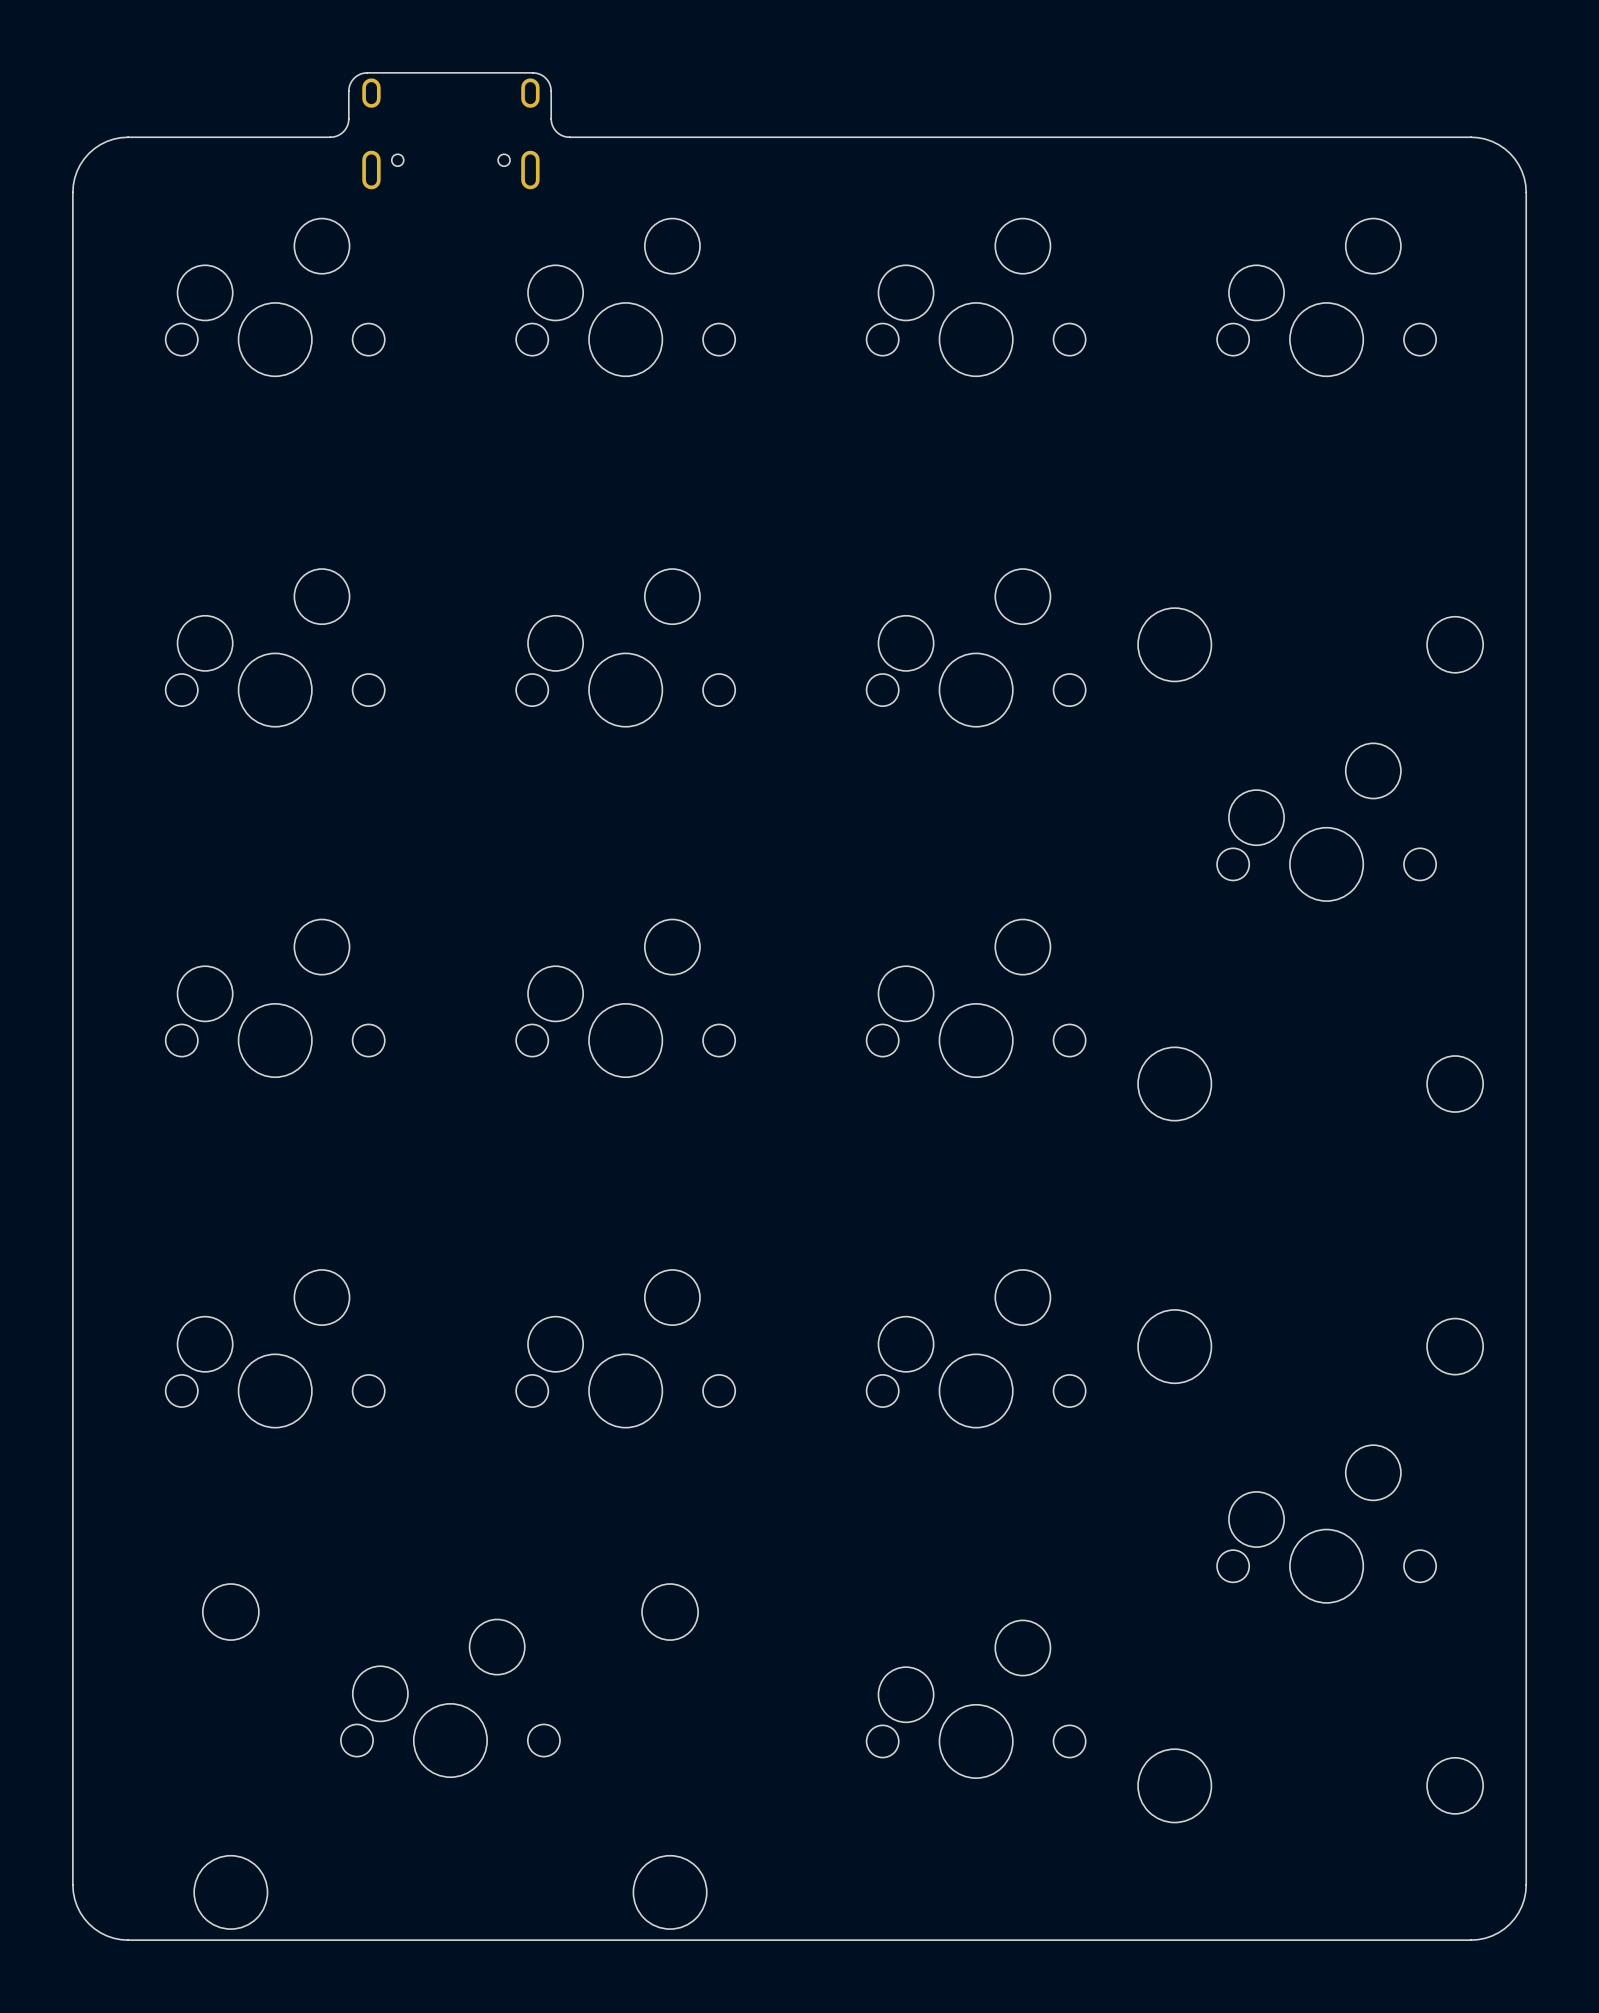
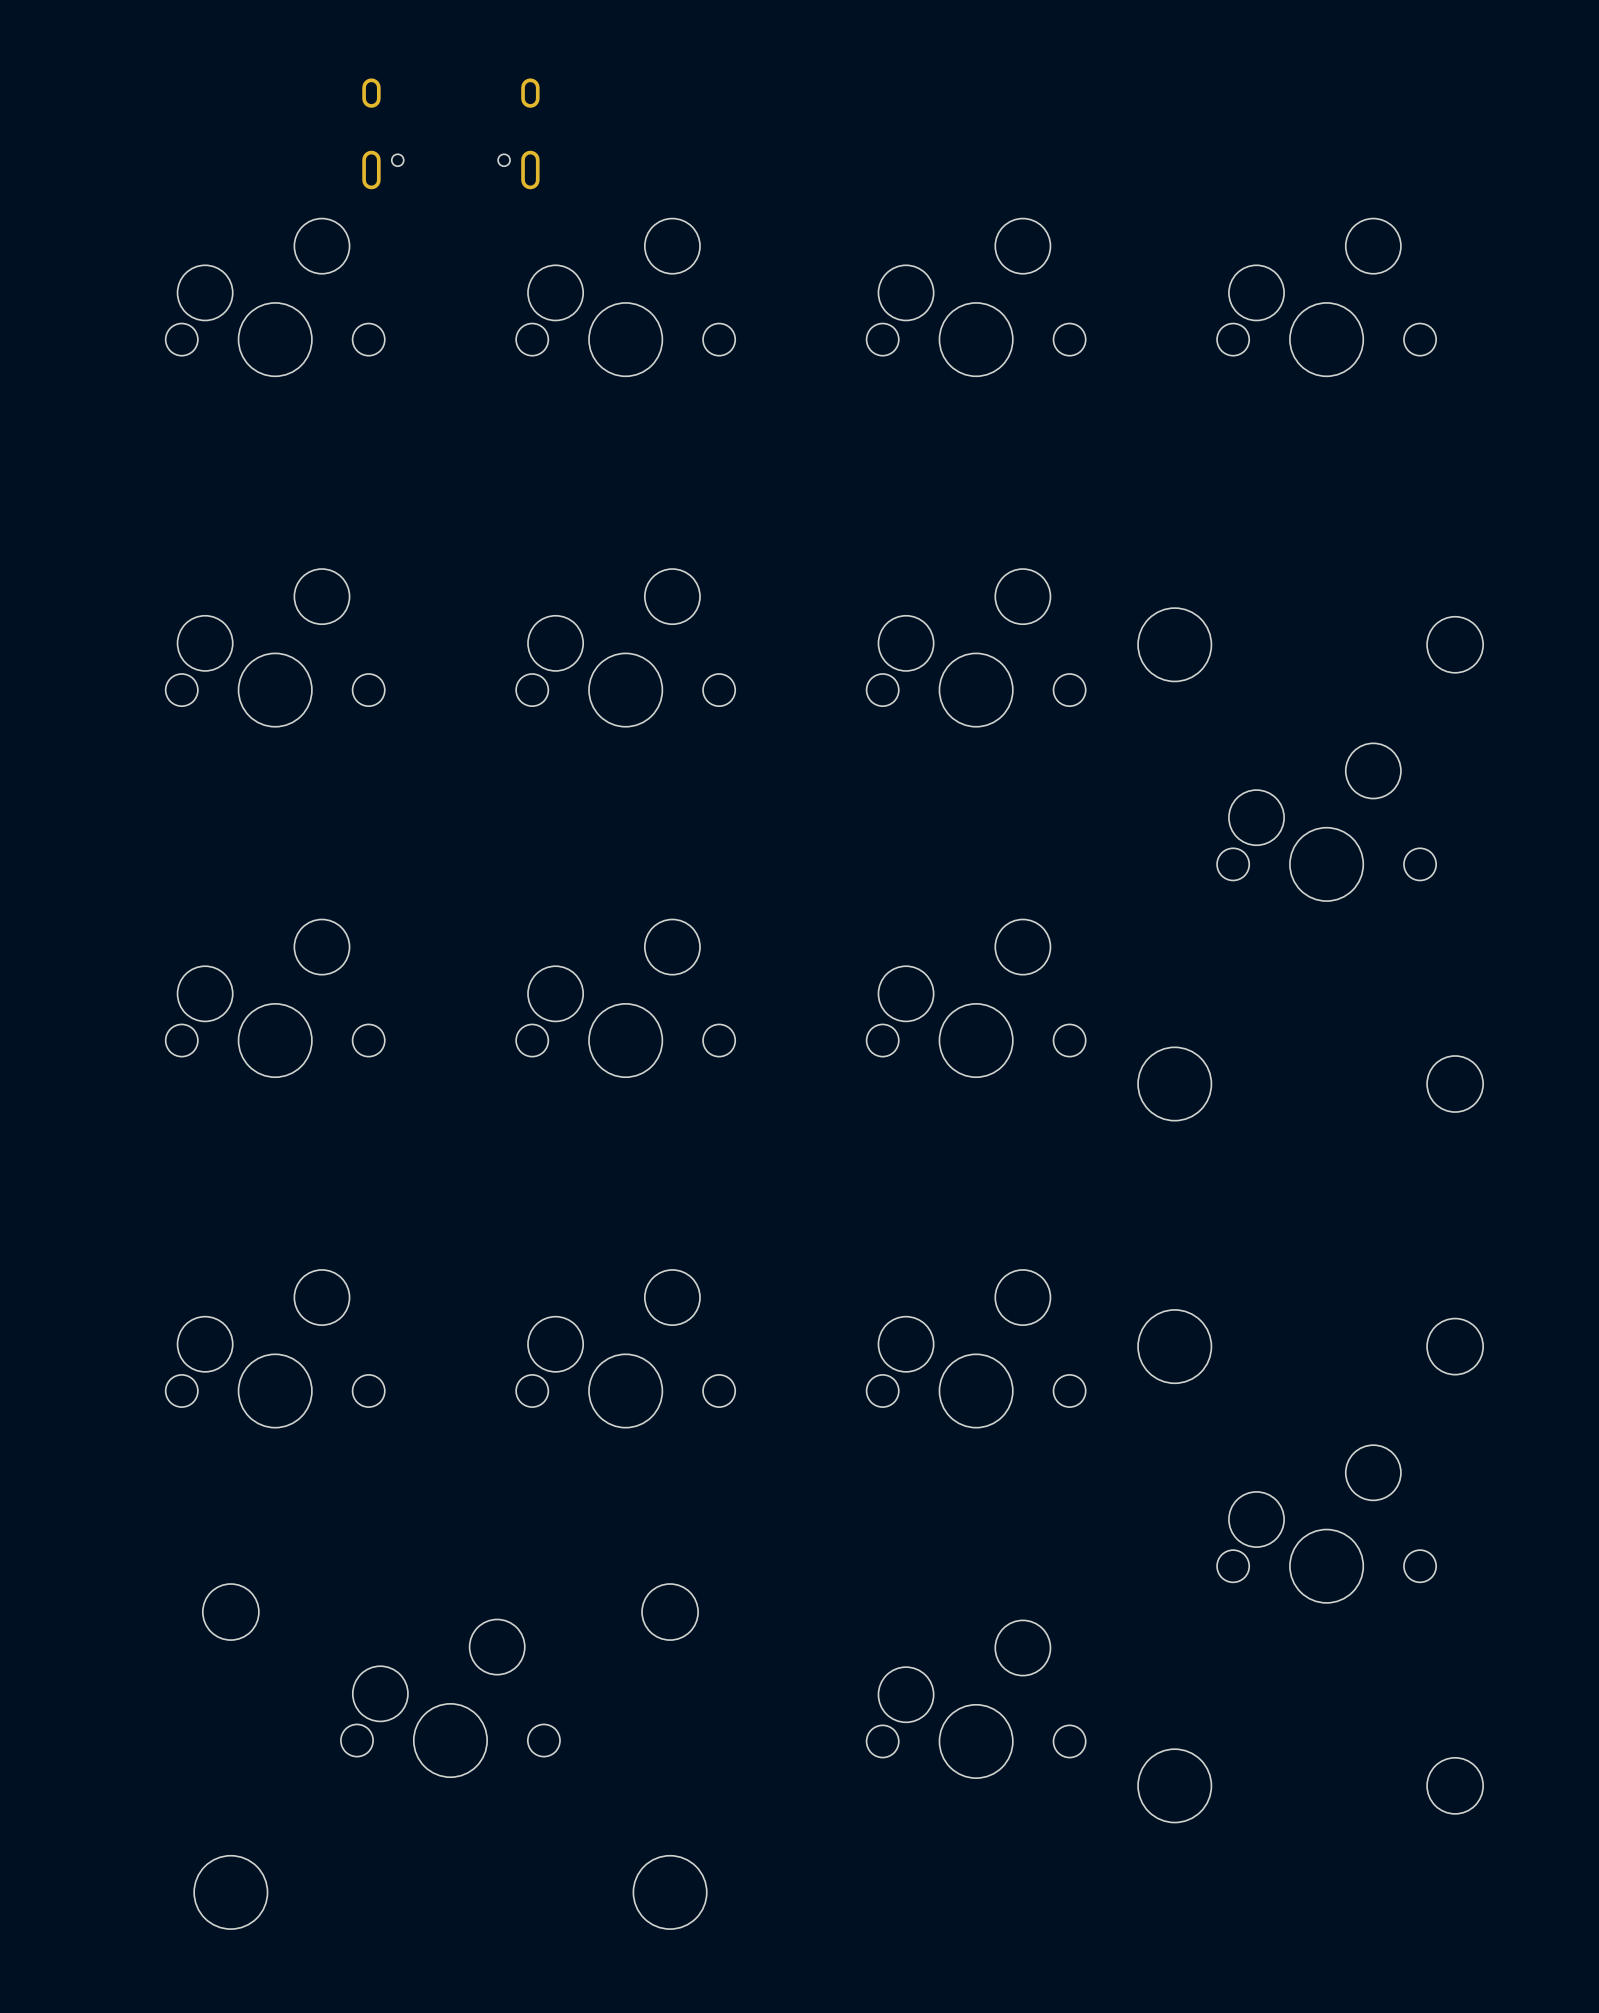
board edge: (367, 72) (537, 73) (545, 78) (550, 86) (552, 125) (558, 133) (567, 137) (1471, 137) (1485, 139) (1498, 144) (1510, 153) (1518, 164) (1524, 178) (1526, 192) (1526, 1884) (1524, 1899) (1518, 1912) (1510, 1923) (1498, 1932) (1485, 1938) (1471, 1940) (128, 1940) (113, 1938) (100, 1932) (89, 1923) (80, 1912) (74, 1899) (72, 1884) (73, 185) (77, 171) (89, 153) (100, 144) (120, 137) (337, 135) (343, 131) (348, 123) (350, 84) (358, 75) (367, 72) -> none

